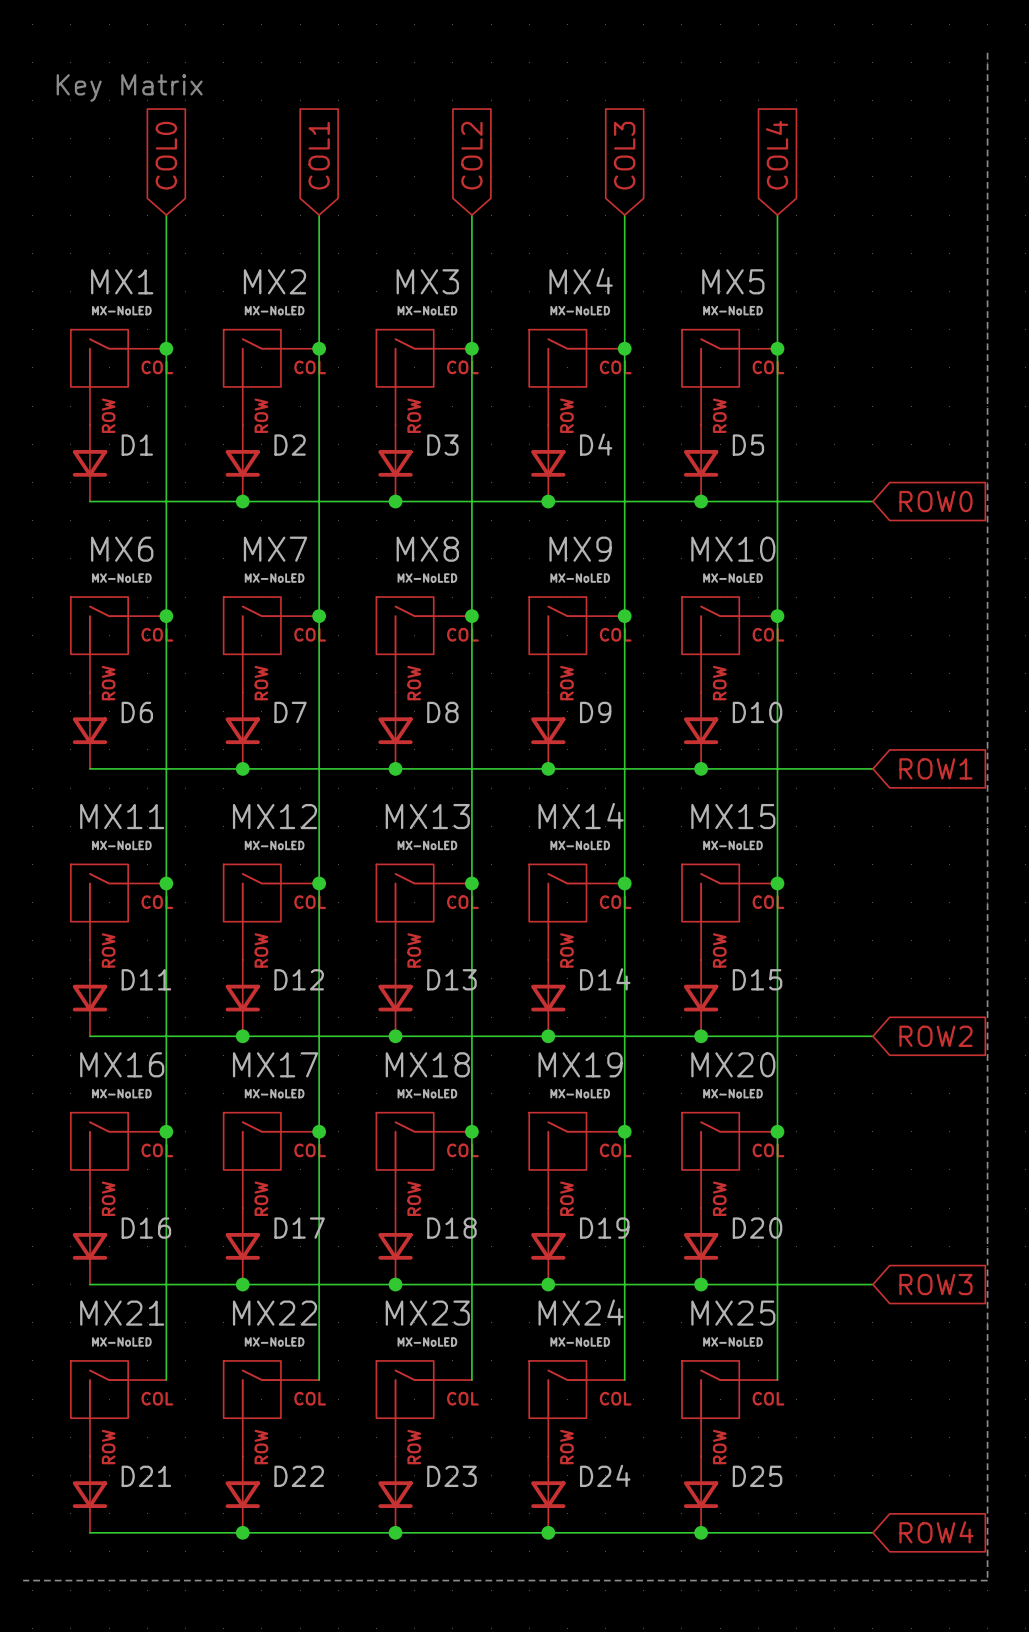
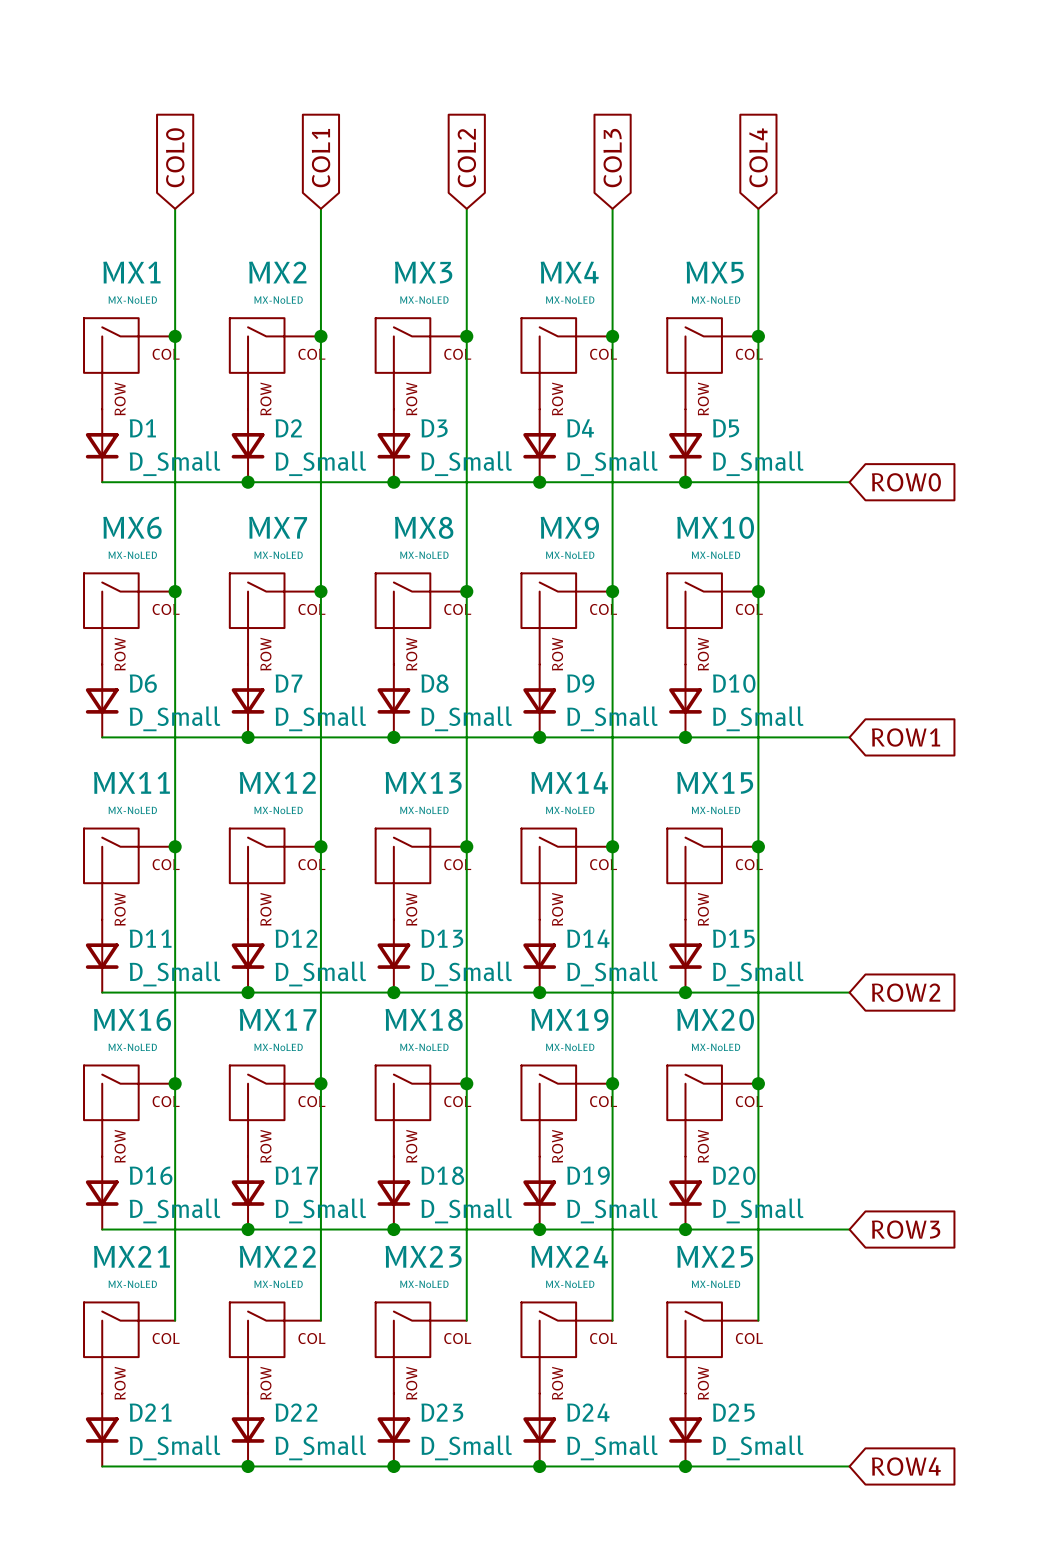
line: (987, 52) (987, 1580) (23, 1580) -> none
text: Key Matrix (129, 88) -> none
D1 value: none -> D_Small (175, 463)
D2 value: none -> D_Small (320, 463)
D3 value: none -> D_Small (466, 463)
D4 value: none -> D_Small (612, 463)
D5 value: none -> D_Small (758, 463)
D6 value: none -> D_Small (175, 718)
D7 value: none -> D_Small (320, 718)
D8 value: none -> D_Small (466, 718)
D9 value: none -> D_Small (612, 718)
D10 value: none -> D_Small (758, 718)
D11 value: none -> D_Small (175, 973)
D12 value: none -> D_Small (320, 973)
D13 value: none -> D_Small (466, 973)
D14 value: none -> D_Small (612, 973)
D15 value: none -> D_Small (758, 973)
D16 value: none -> D_Small (175, 1210)
D17 value: none -> D_Small (320, 1210)
D18 value: none -> D_Small (466, 1210)
D19 value: none -> D_Small (612, 1210)
D20 value: none -> D_Small (758, 1210)
D21 value: none -> D_Small (175, 1447)
D22 value: none -> D_Small (320, 1447)
D23 value: none -> D_Small (466, 1447)
D24 value: none -> D_Small (612, 1447)
D25 value: none -> D_Small (758, 1447)

